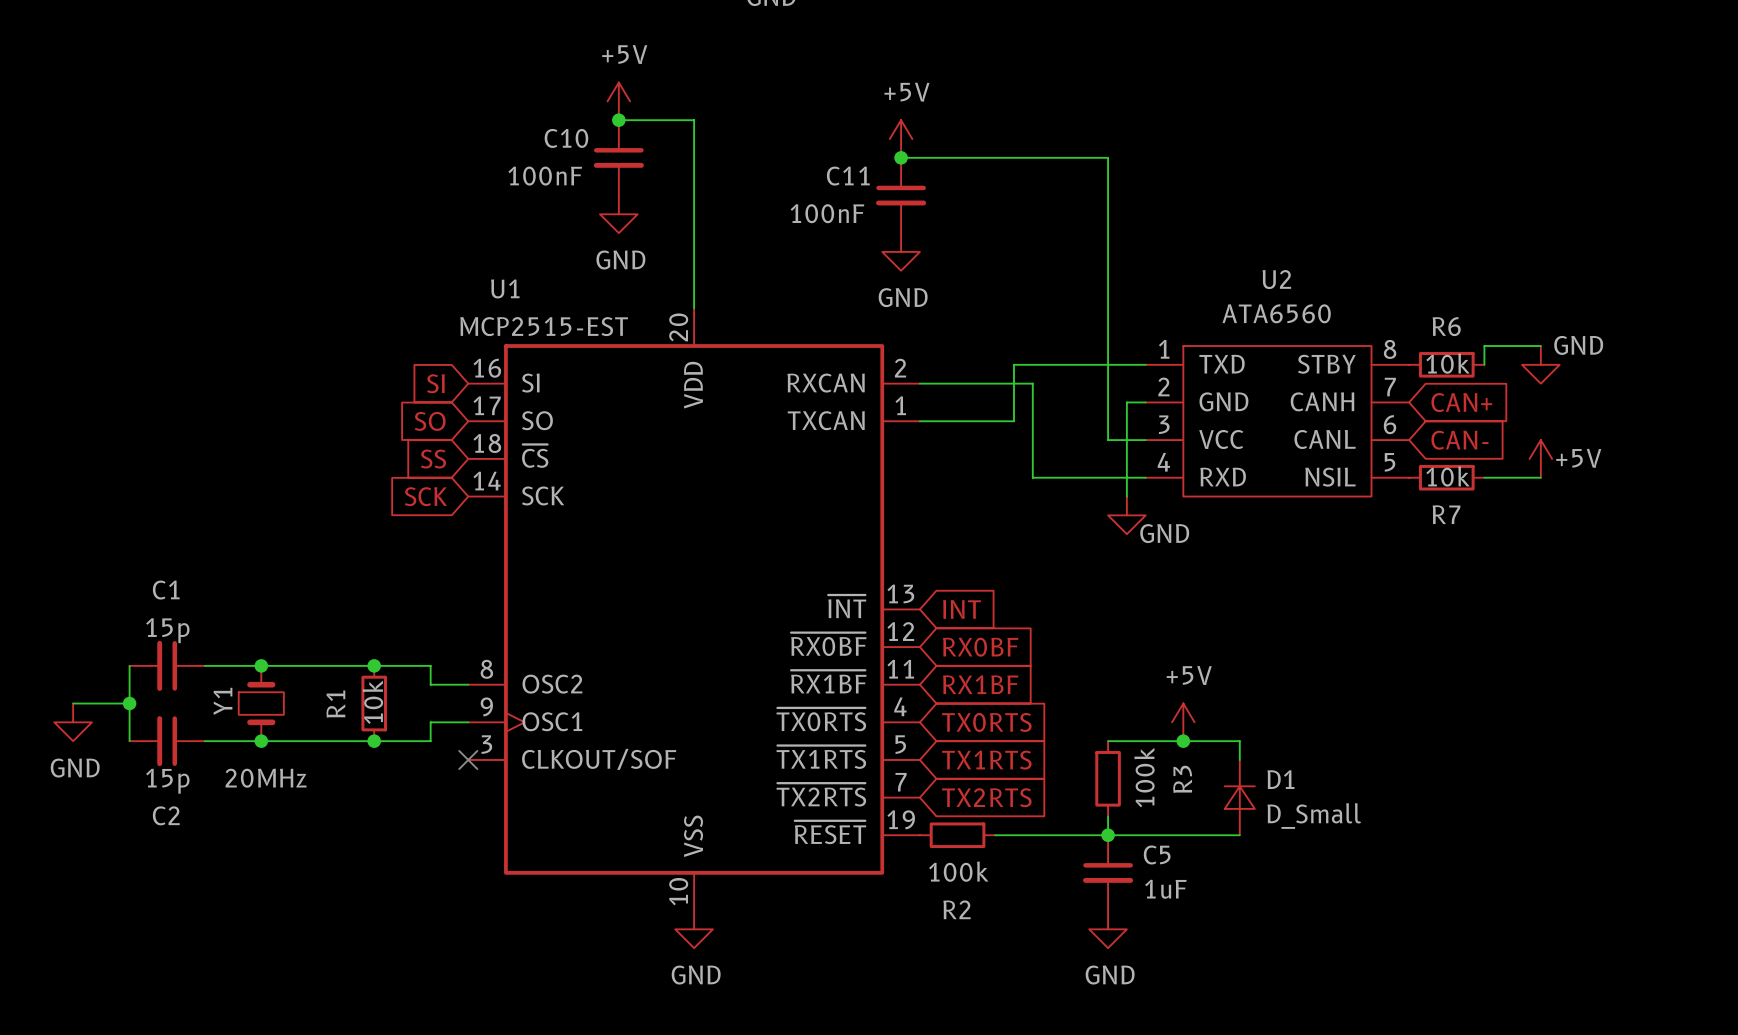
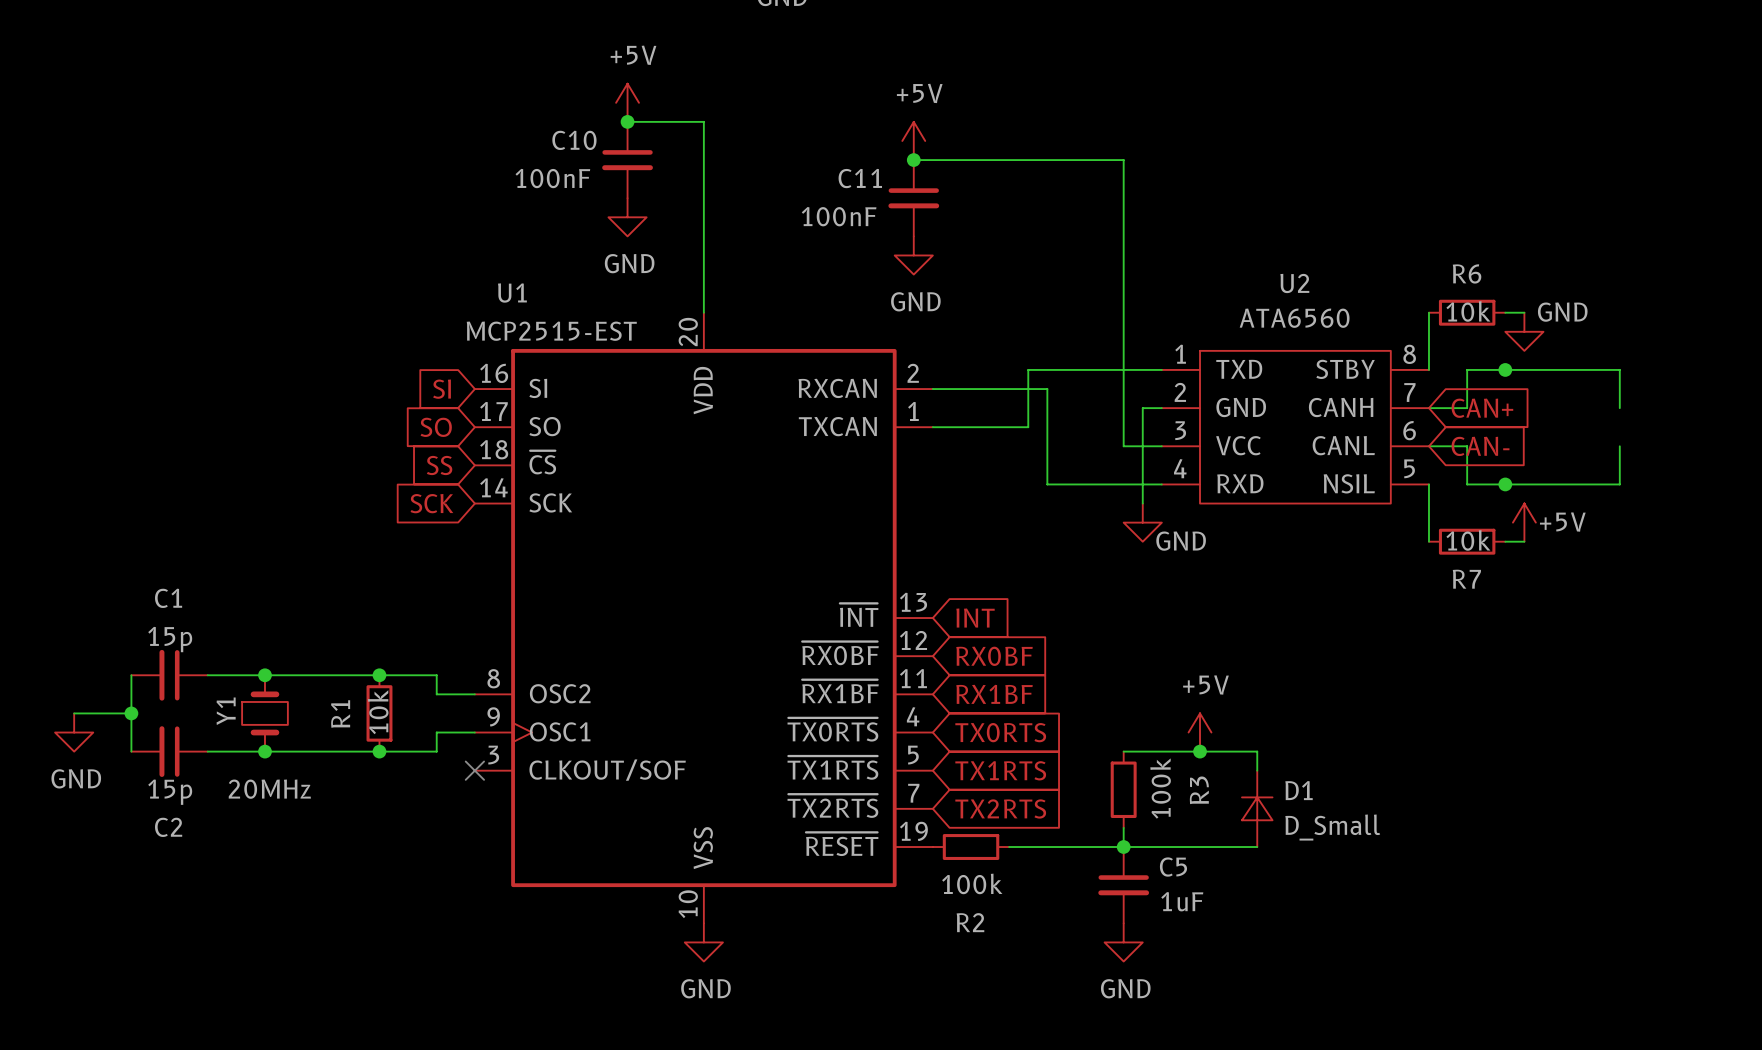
wire: none -> (1428, 312) (1428, 369)
wire: none -> (1505, 312) (1524, 312)
wire: (1540, 346) (1484, 346) (1484, 364) -> none
R6 position: (1446, 364) -> (1467, 312)
junction: none -> (1505, 369)
power symbol position: GND (1540, 364) -> GND (1524, 331)
wire: none -> (1428, 408) (1467, 408) (1467, 369) (1619, 369) (1619, 408)
wire: none -> (1428, 446) (1467, 446) (1467, 484) (1505, 484)
wire: none -> (1619, 446) (1619, 484) (1562, 484)
power symbol position: +5V (1540, 458) -> +5V (1524, 522)
wire: none -> (1428, 484) (1428, 541)
R7 position: (1446, 477) -> (1467, 541)
junction: none -> (1505, 484)
wire: none -> (1505, 541) (1524, 541)

